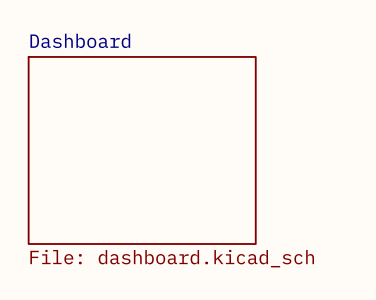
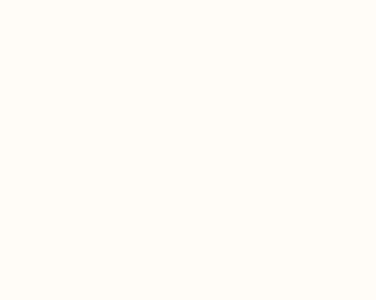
sheet Dashboard: File: dashboard.kicad_sch (142, 150) -> none

